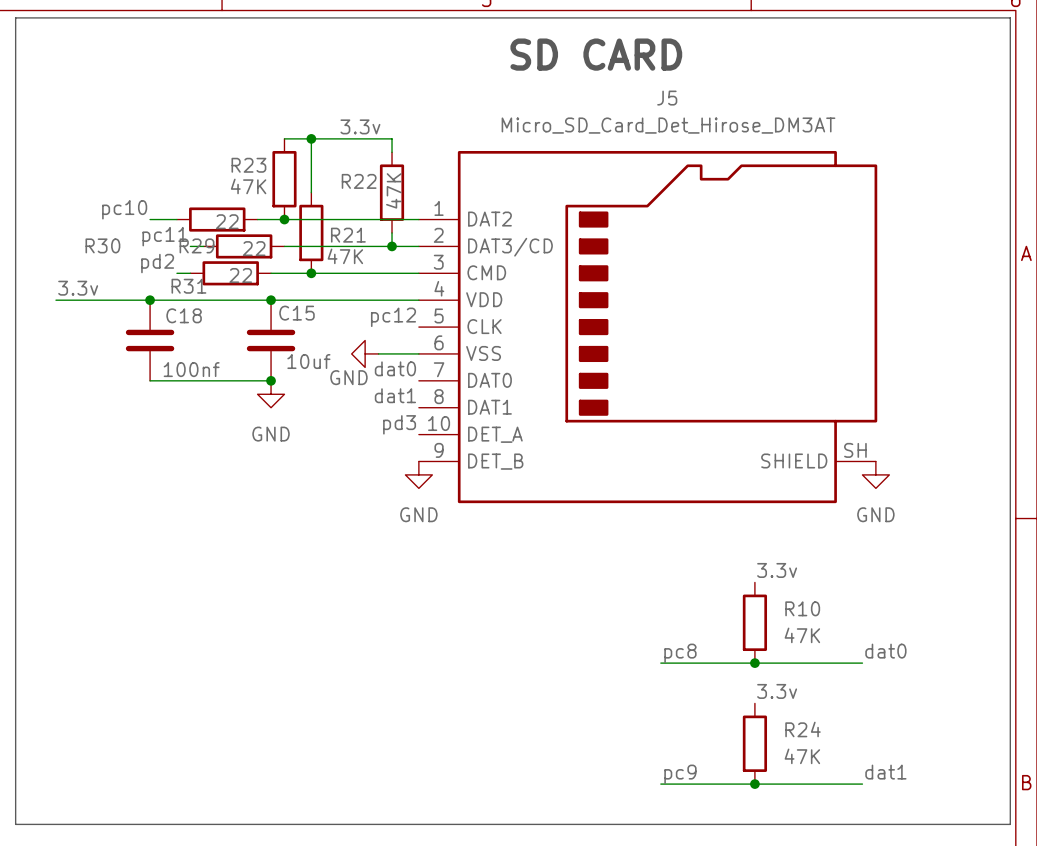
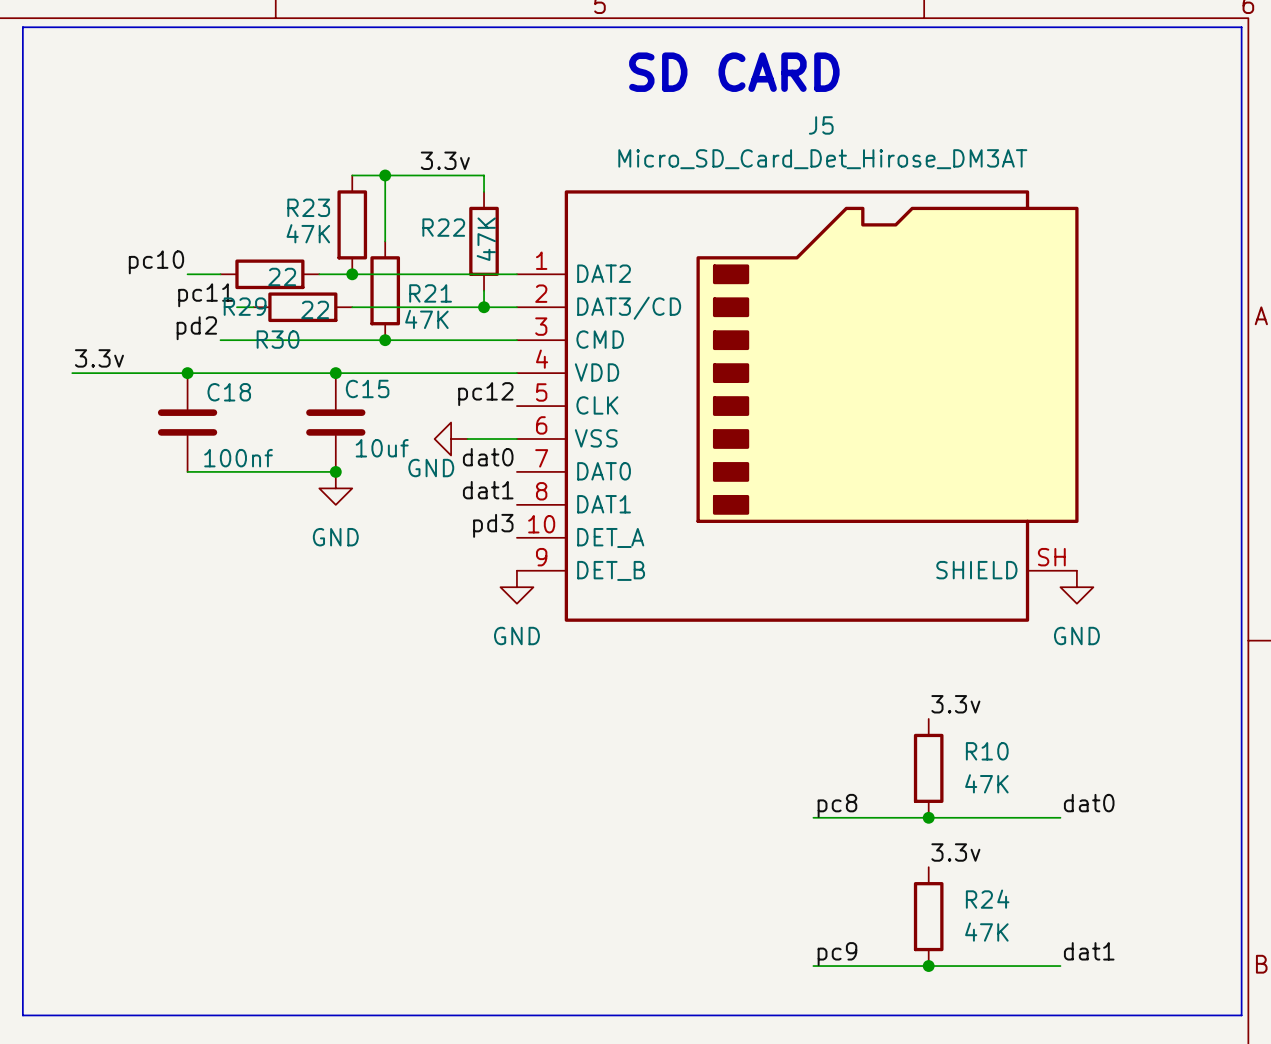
R30 name position: R30 (102, 245) -> R30 (278, 339)
wire: none -> (236, 340) (335, 340)
R31: 22 (230, 273) -> none

